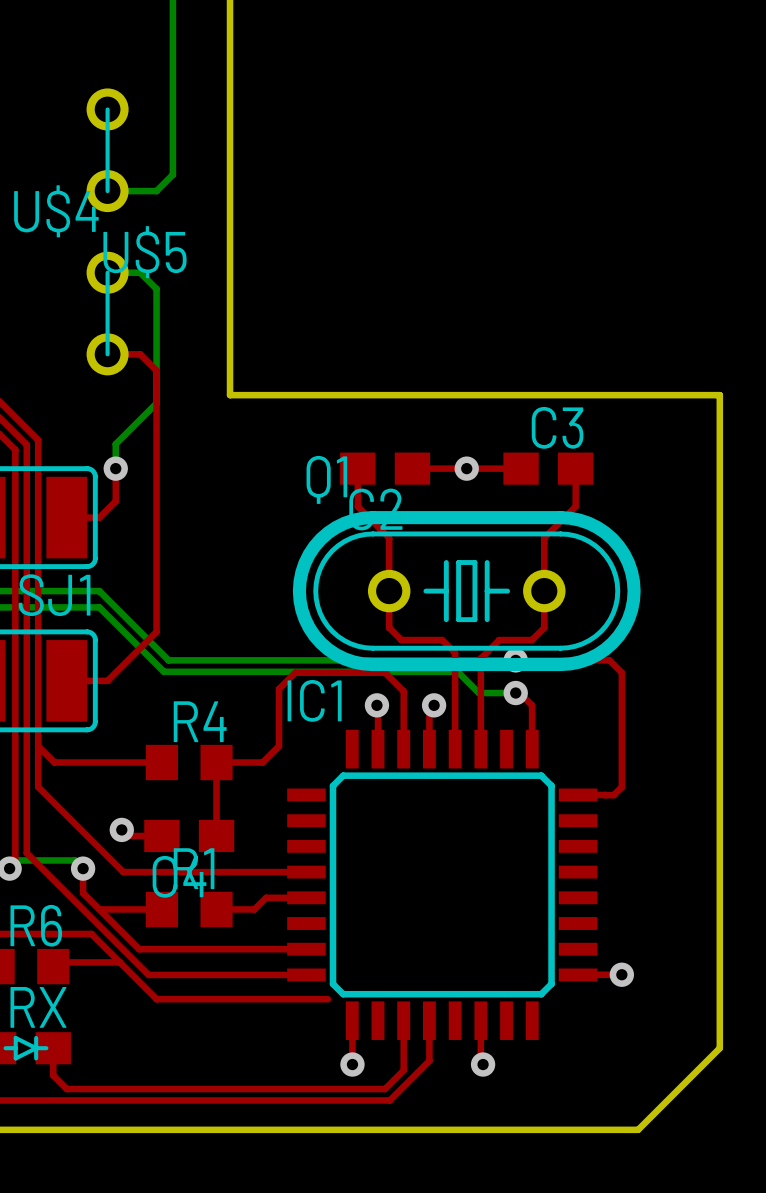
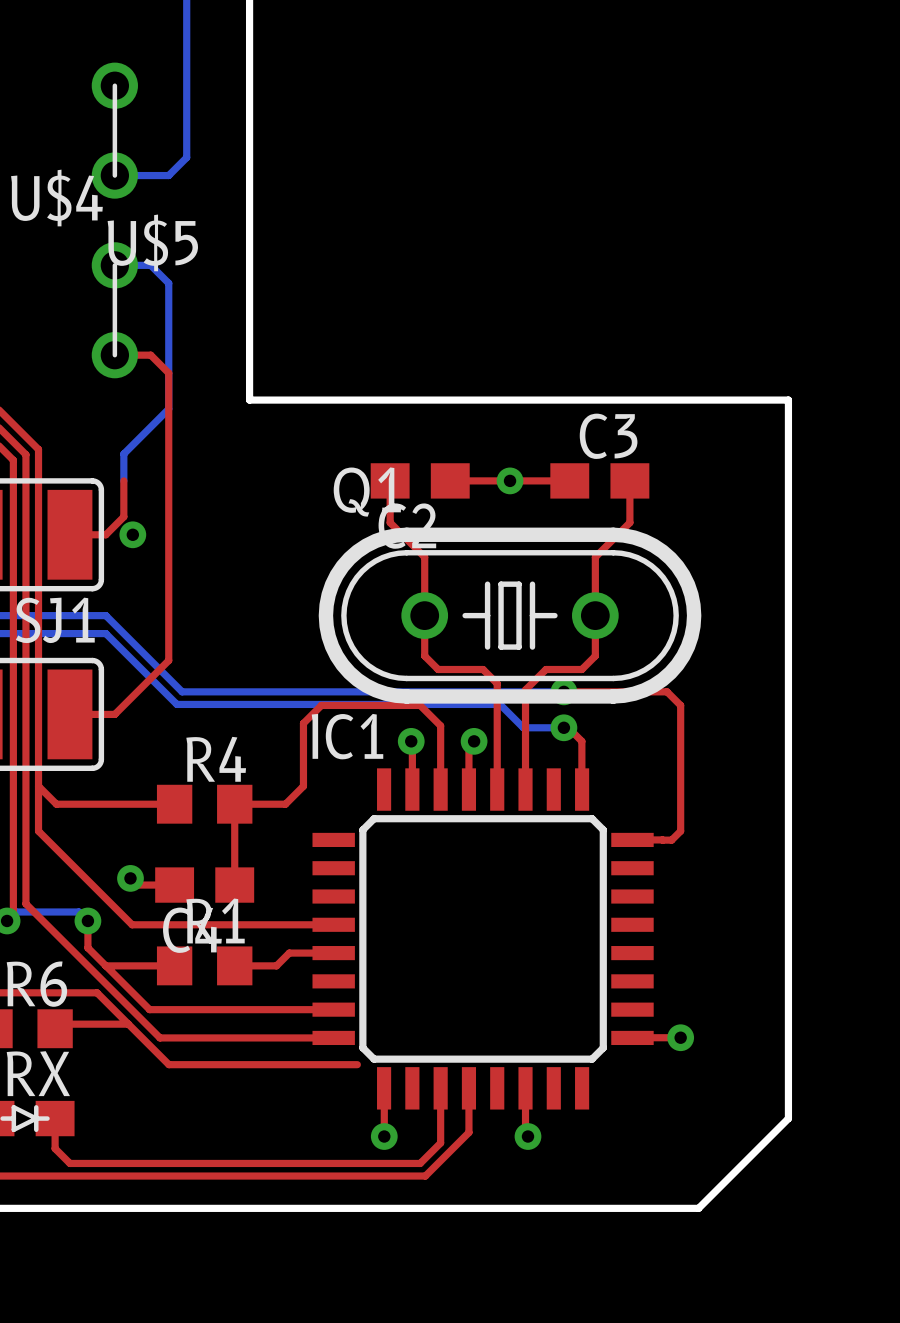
via position: (115, 468) -> (132, 534)

